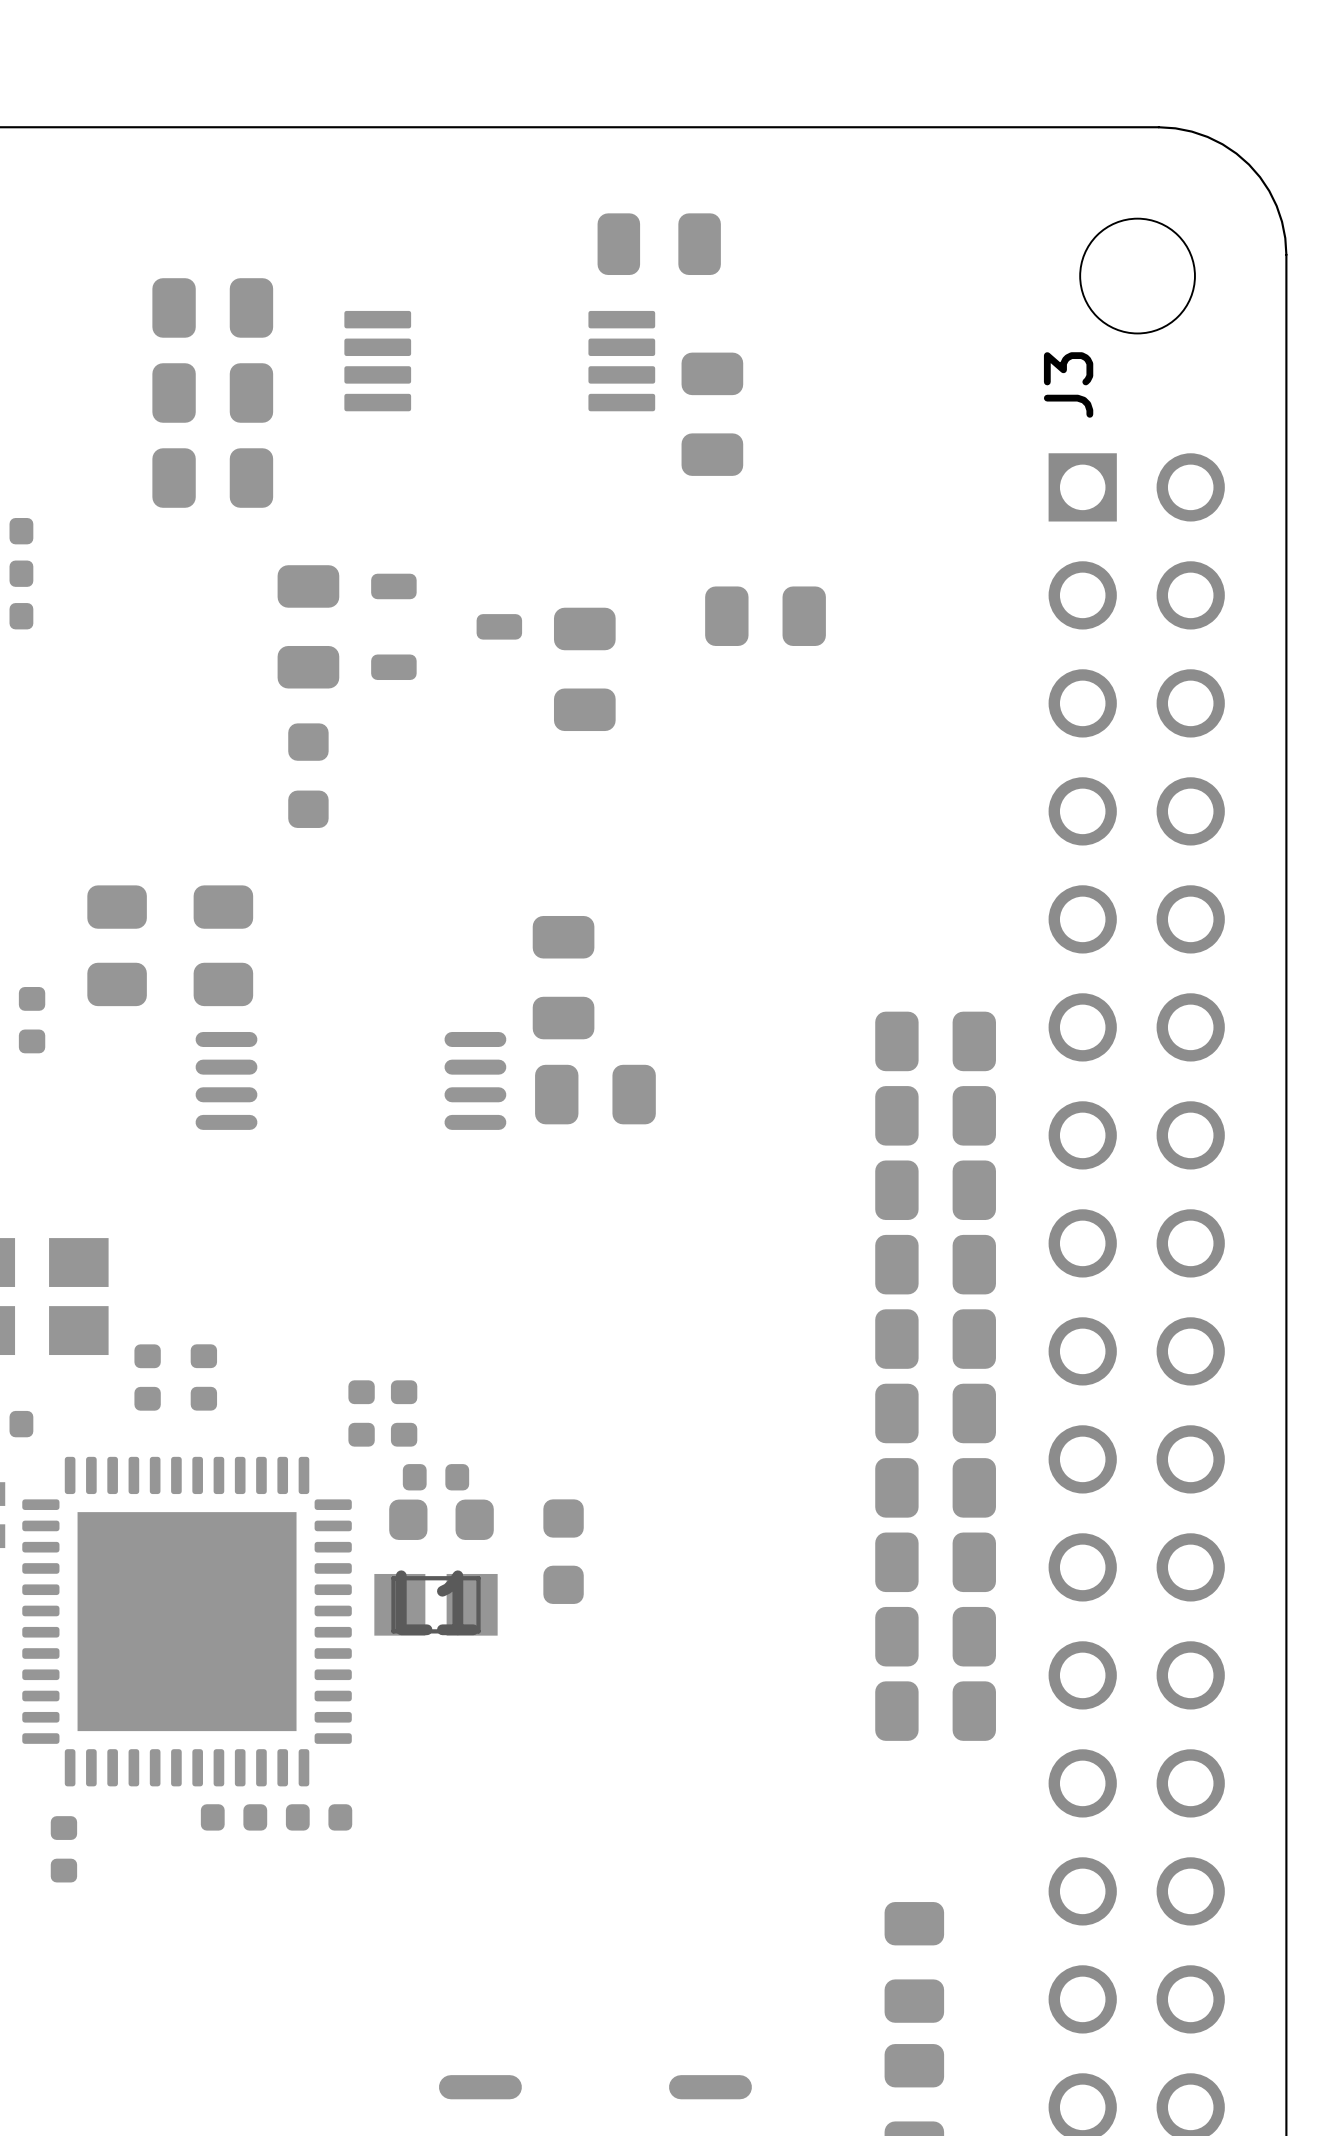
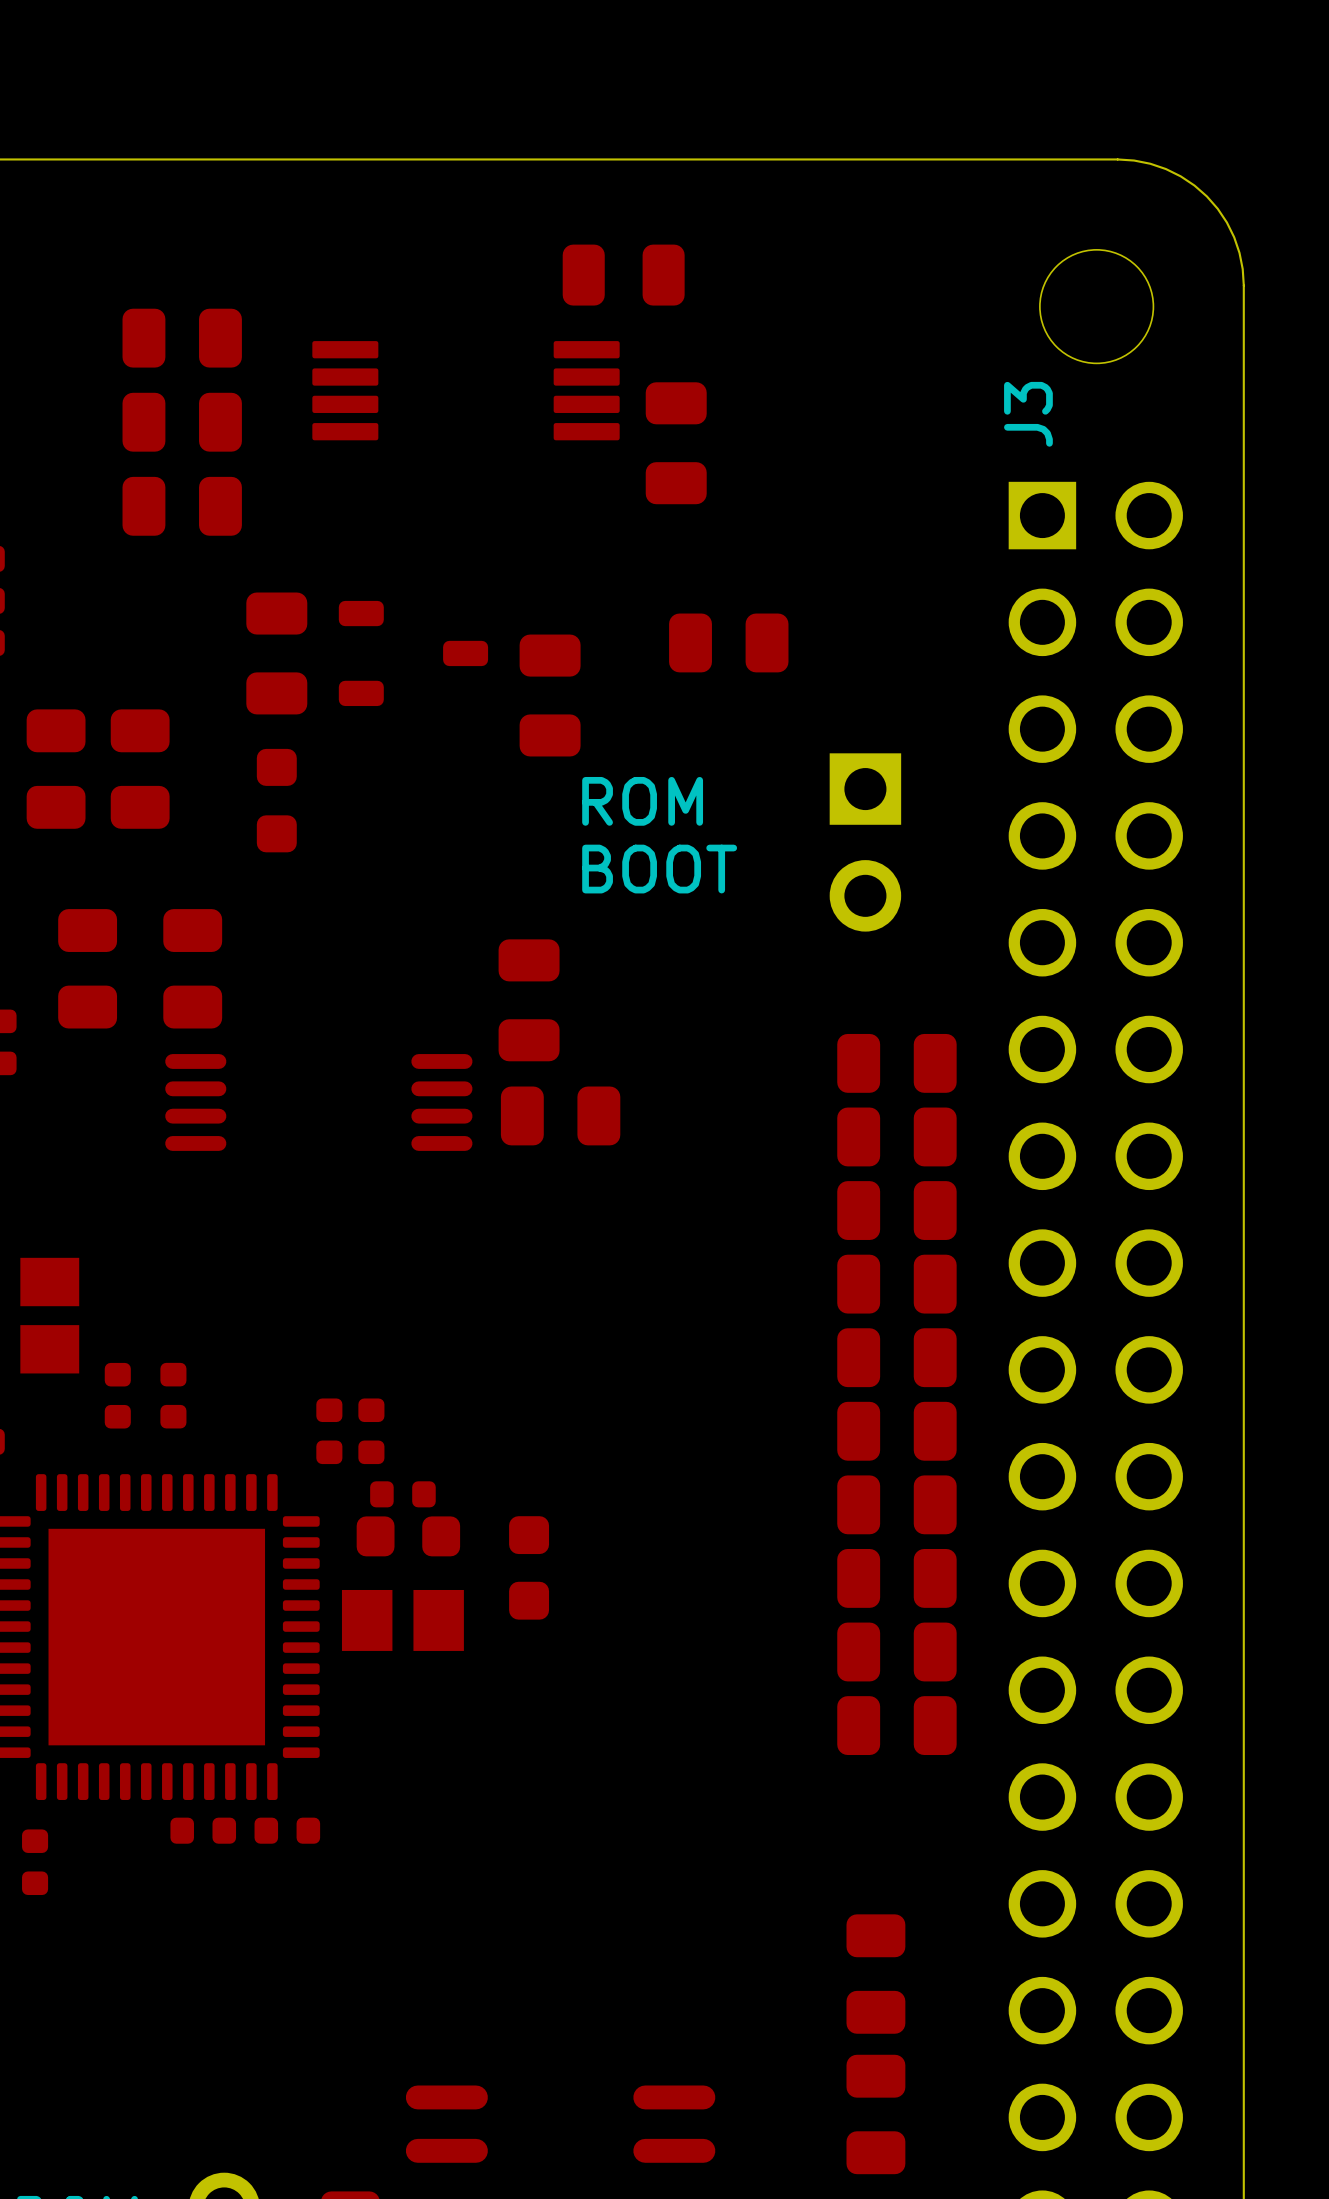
part: none -> (56, 769)
part: none -> (140, 769)
text: none -> ROM (642, 801)
part: none -> (865, 842)
text: none -> BOOT (659, 869)
part: (435, 1604) -> none
part: none -> (402, 1620)

